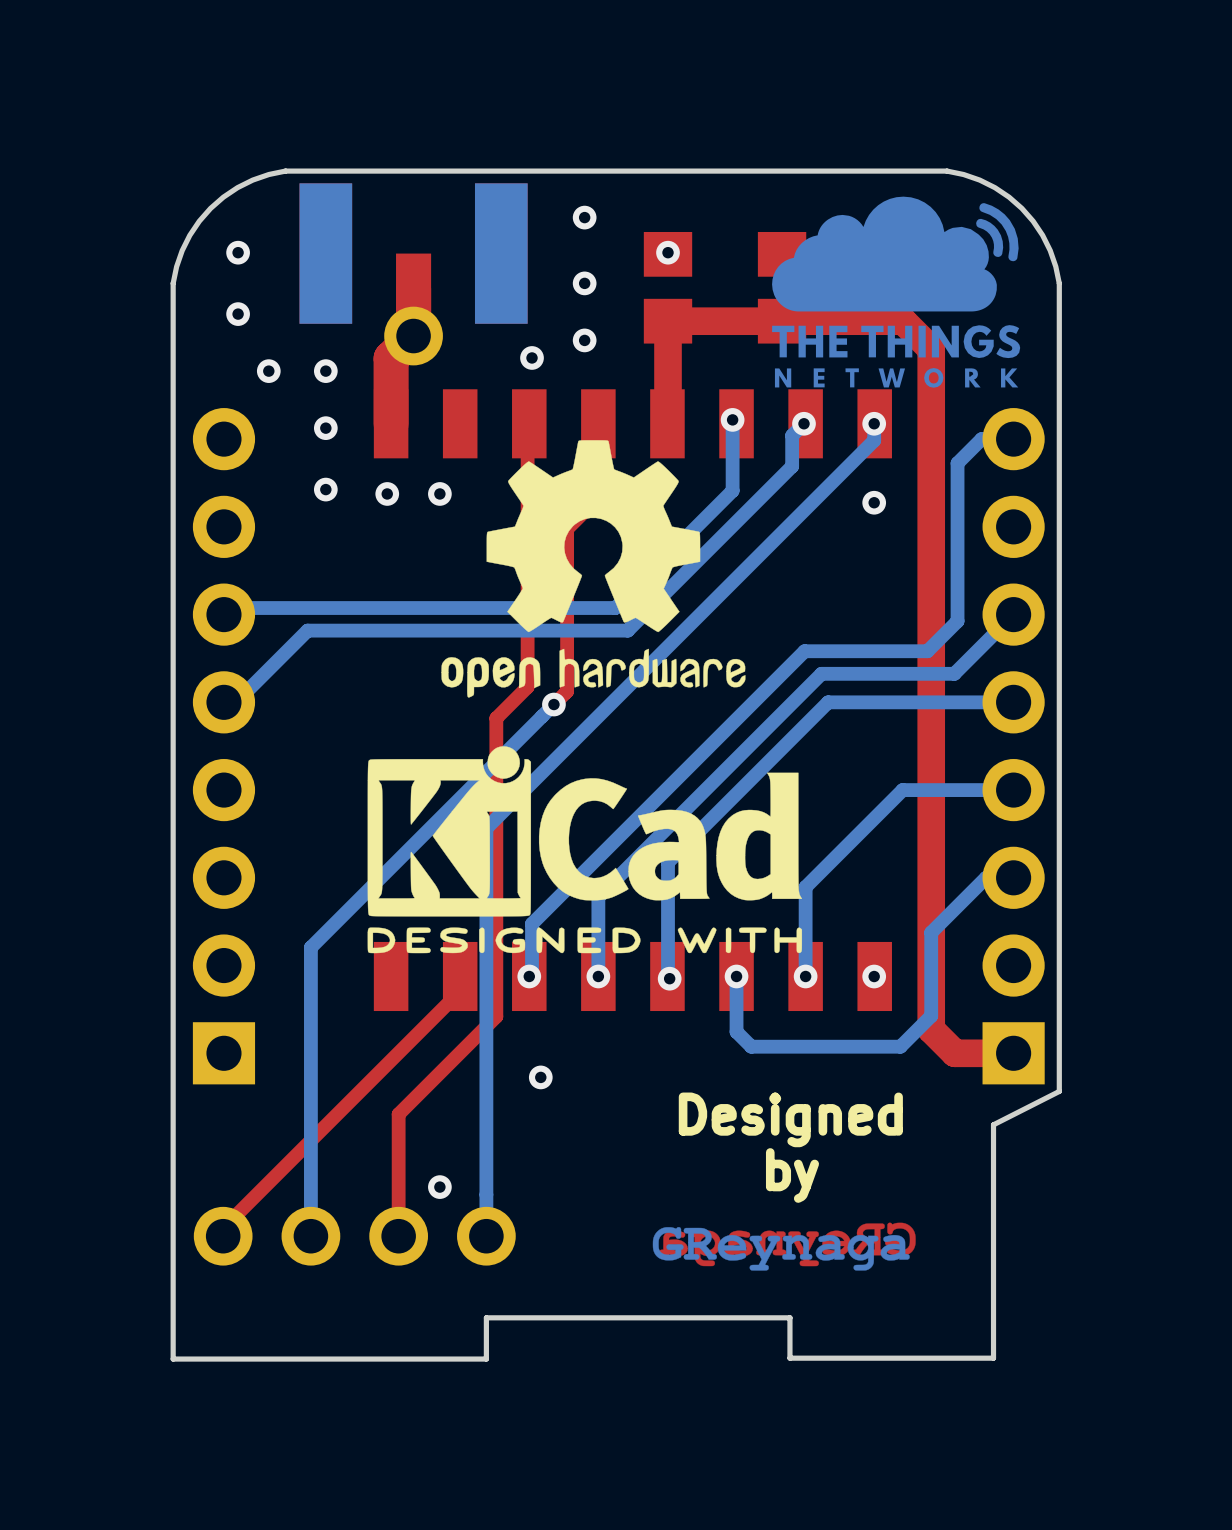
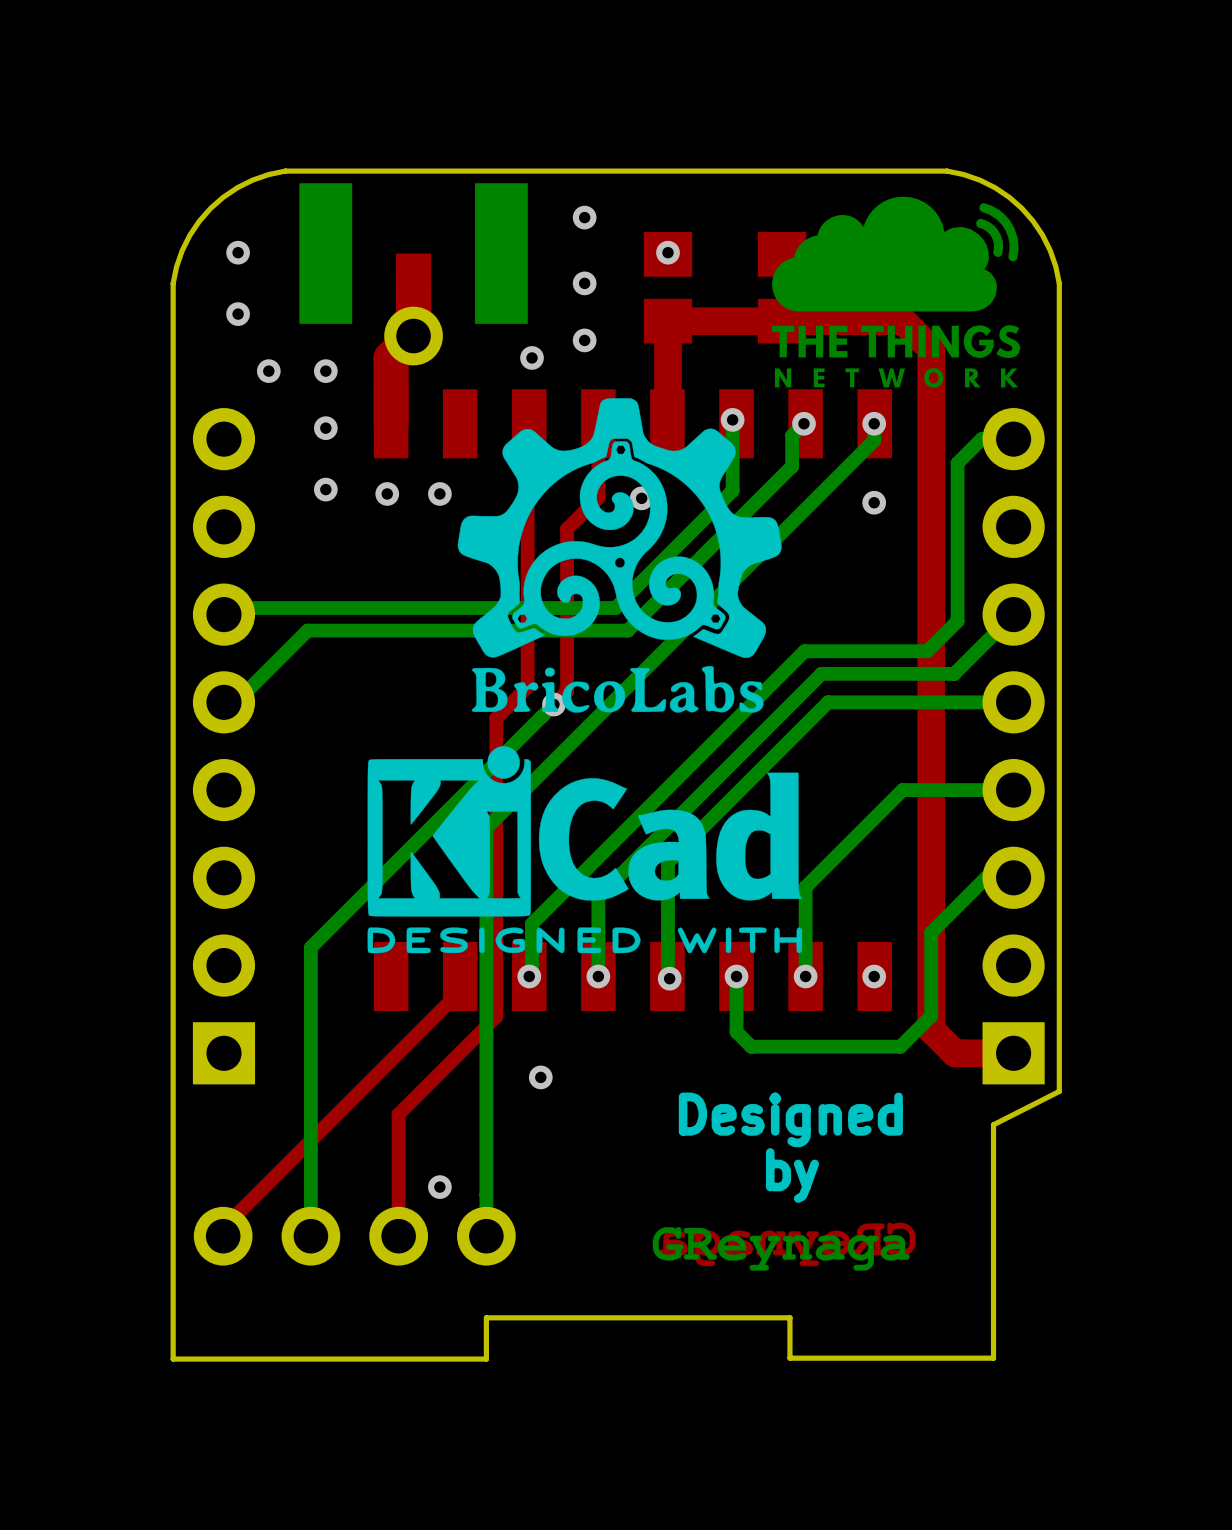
drawing shape: [441, 440, 746, 698] -> [457, 398, 782, 713]

